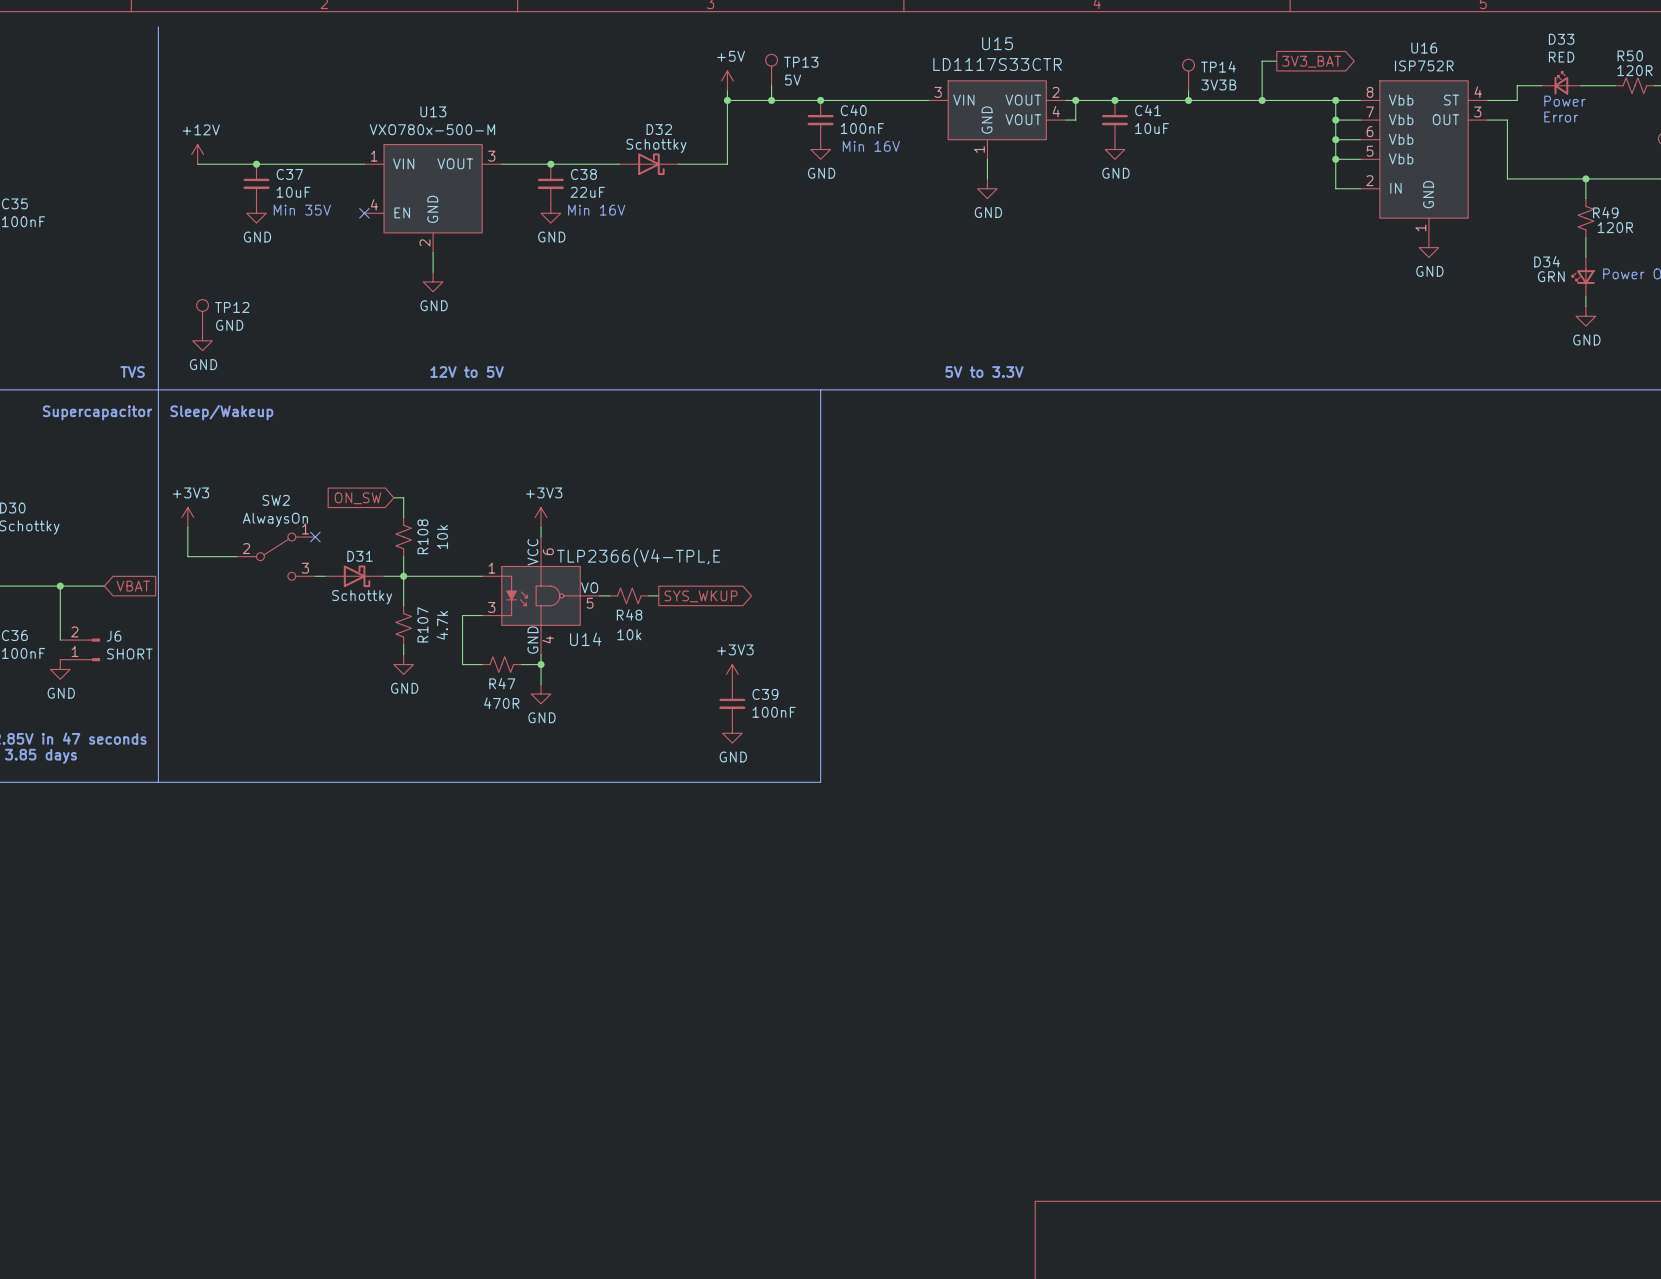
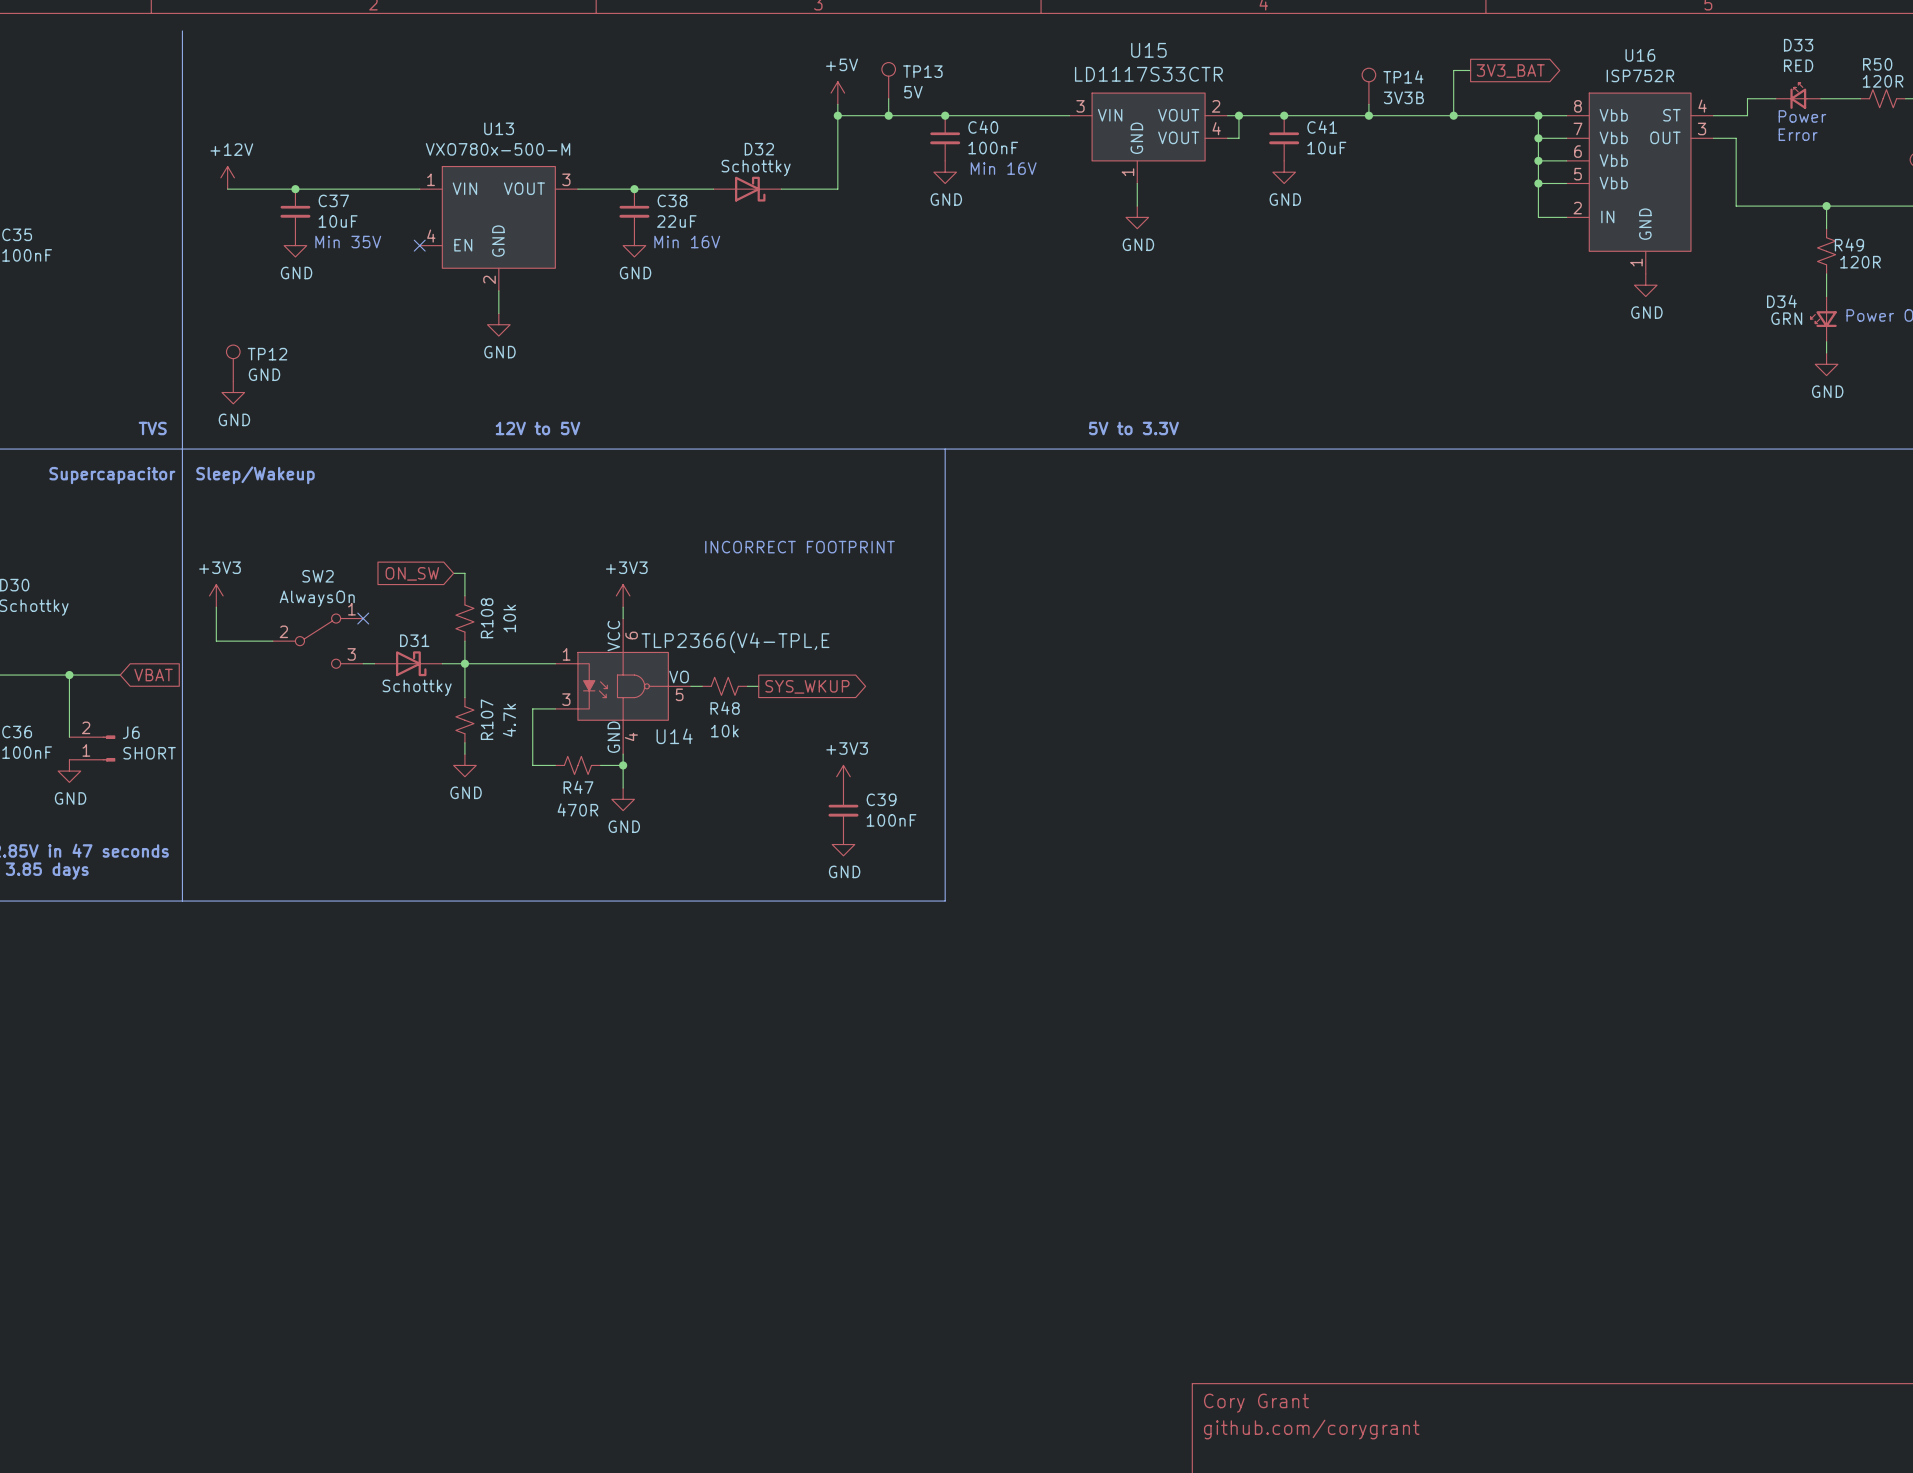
text: none -> INCORRECT FOOTPRINT (799, 547)
title block: none -> Cory Grant (1256, 1403)
title block: none -> github.com/corygrant (1311, 1429)

